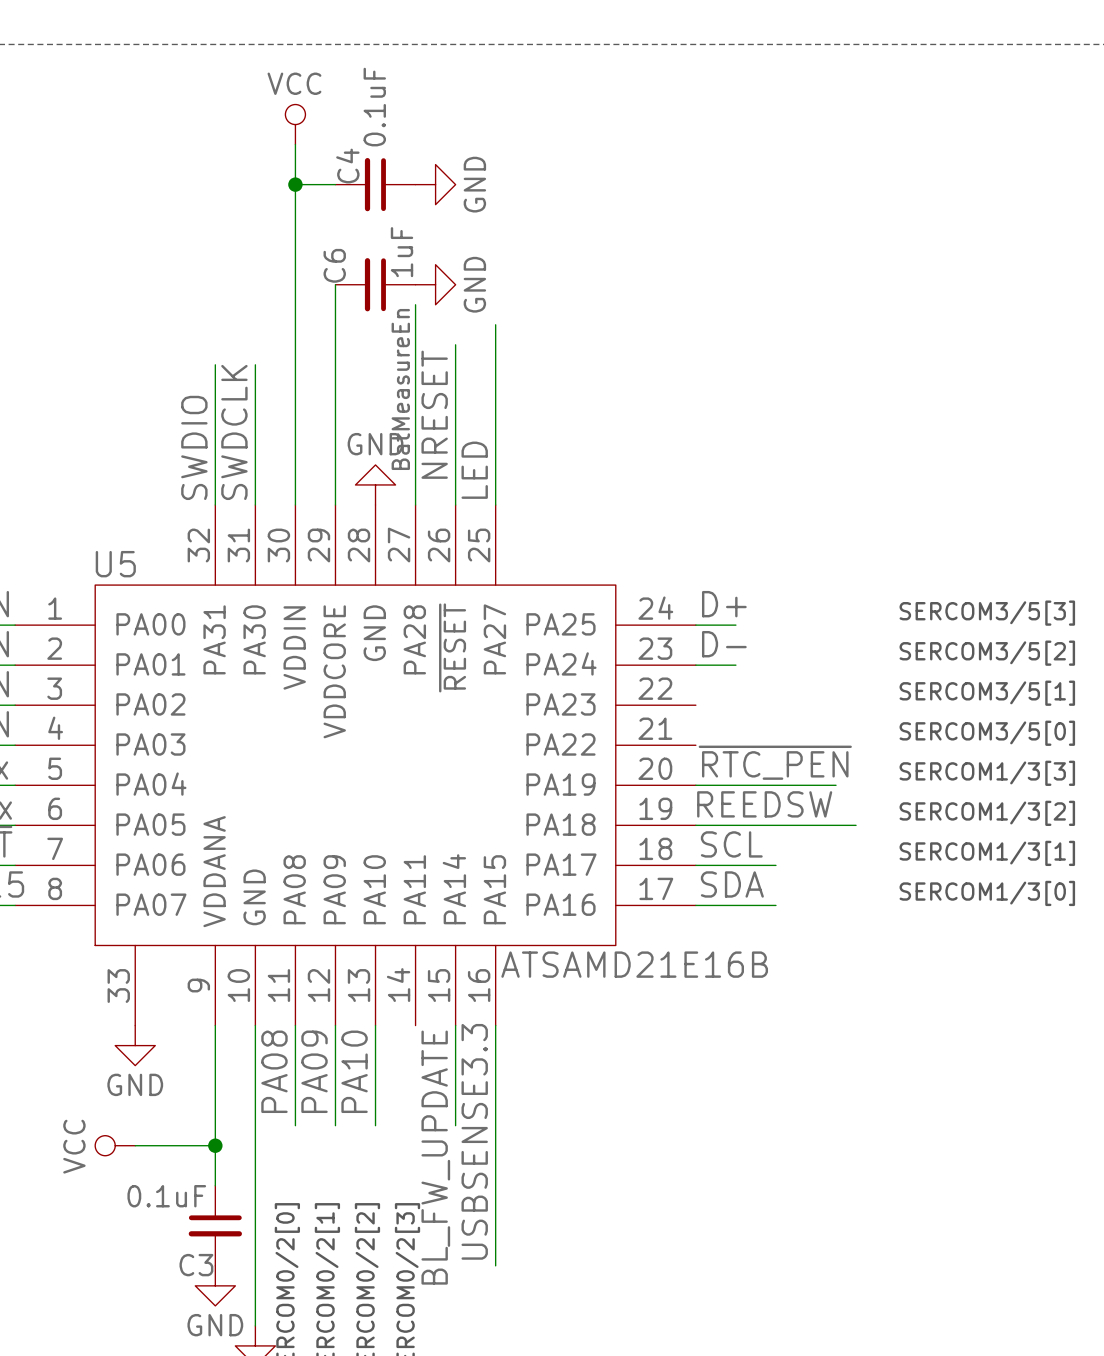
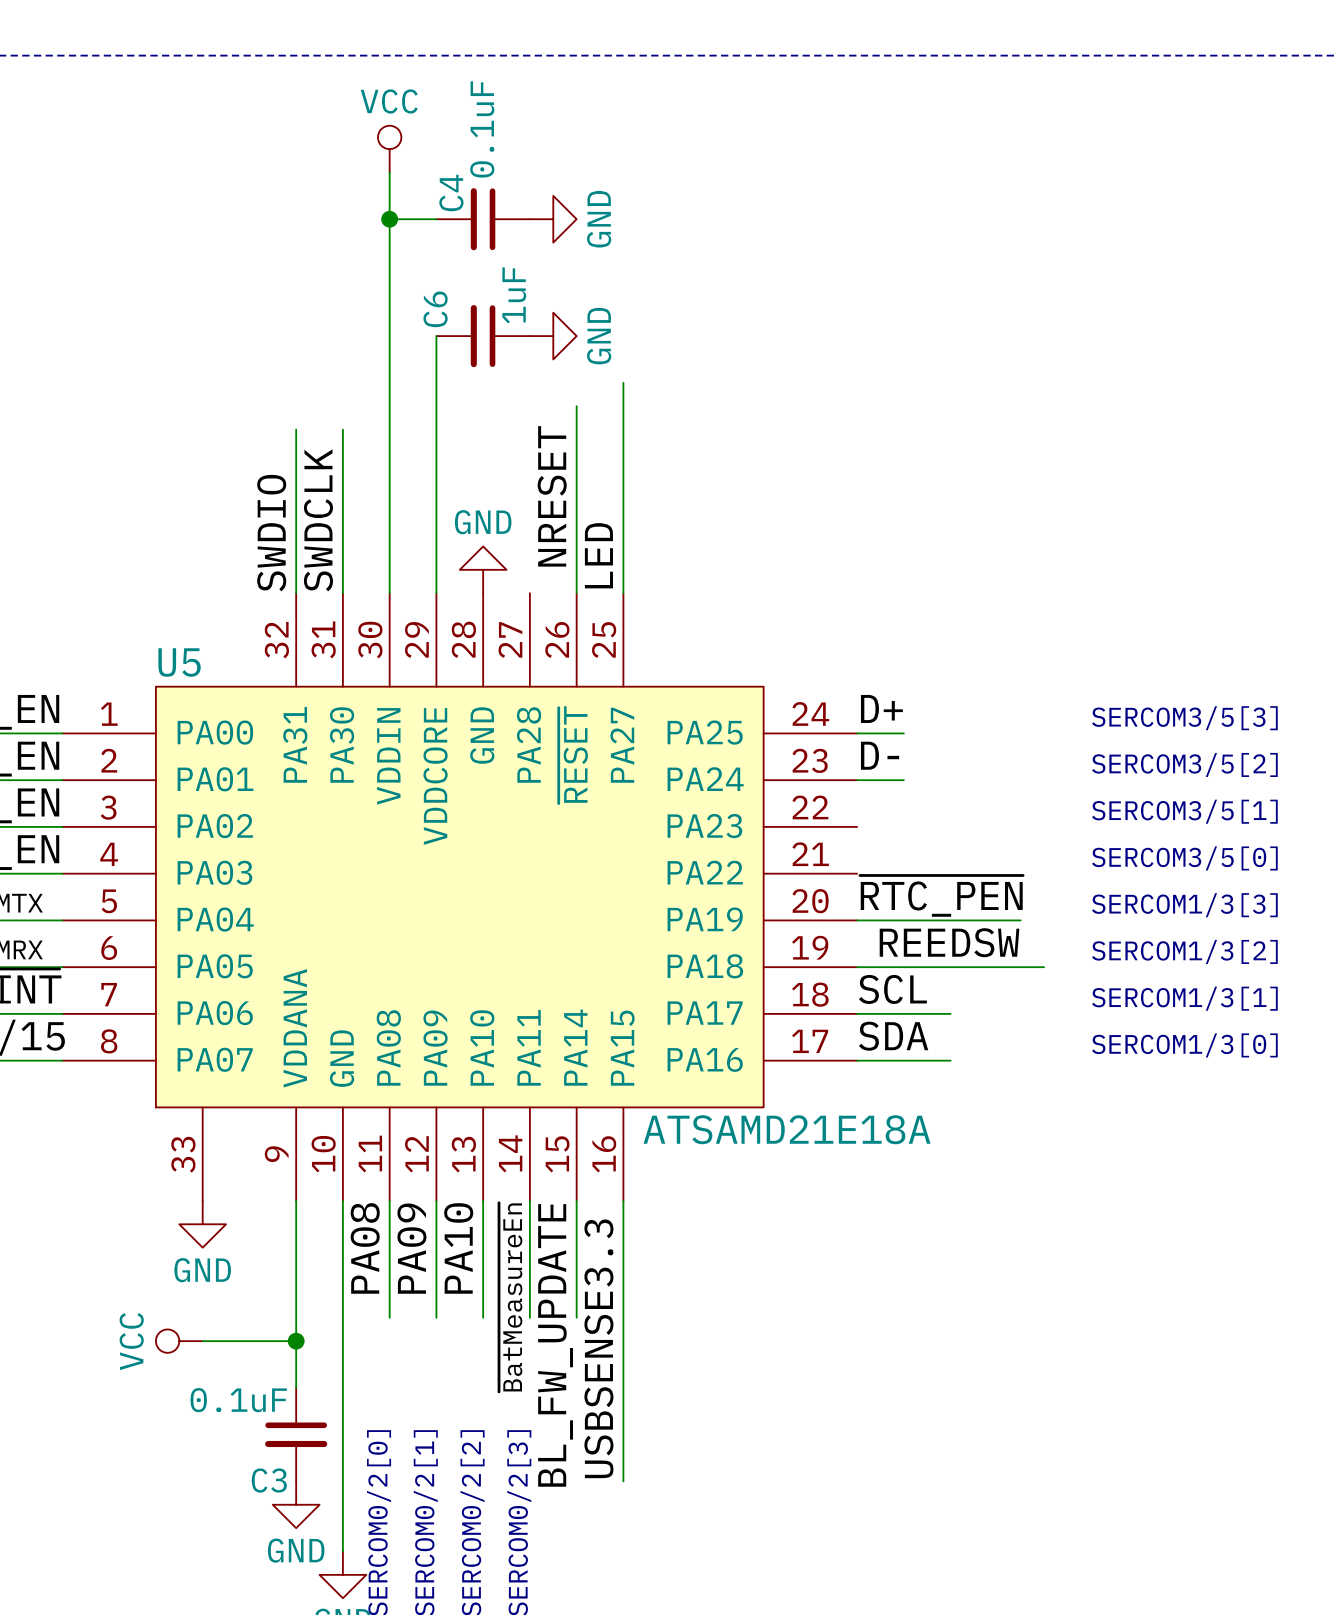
wire: (415, 304) (415, 504) -> none
label: BatMeasureEn (400, 389) -> none
U5 value: ATSAMD21E16B (634, 964) -> ATSAMD21E18A (787, 1129)
wire: none -> (529, 1200) (529, 1317)
label: none -> ~{BatMeasureEn} (510, 1297)

